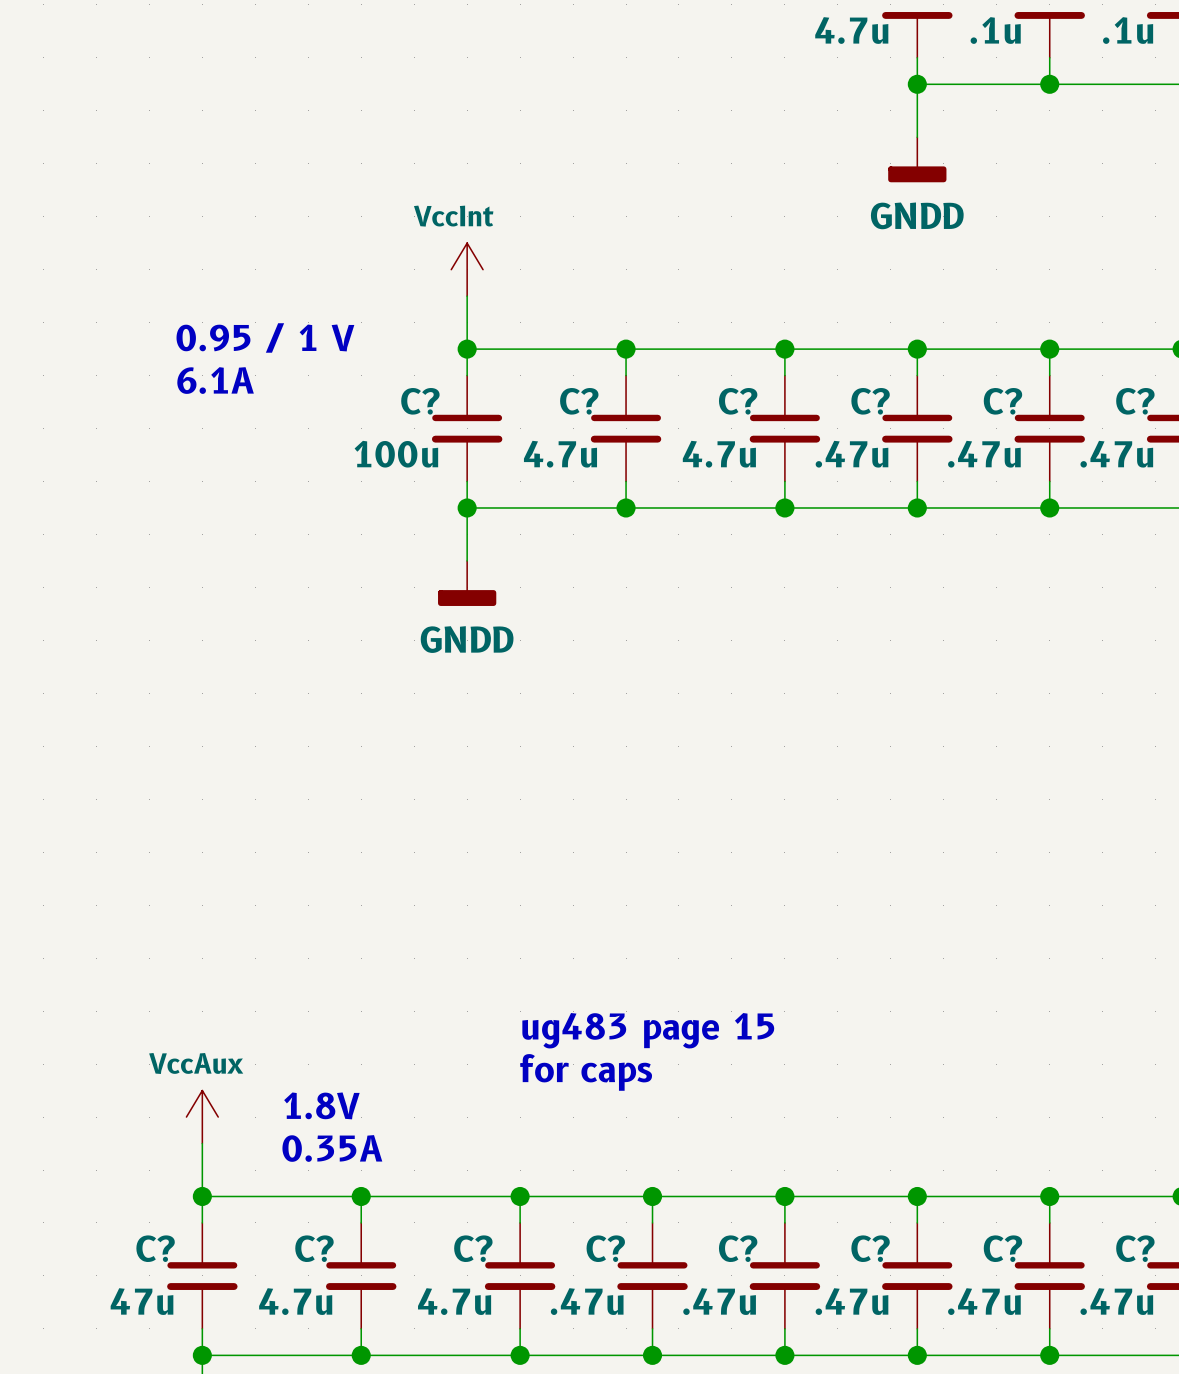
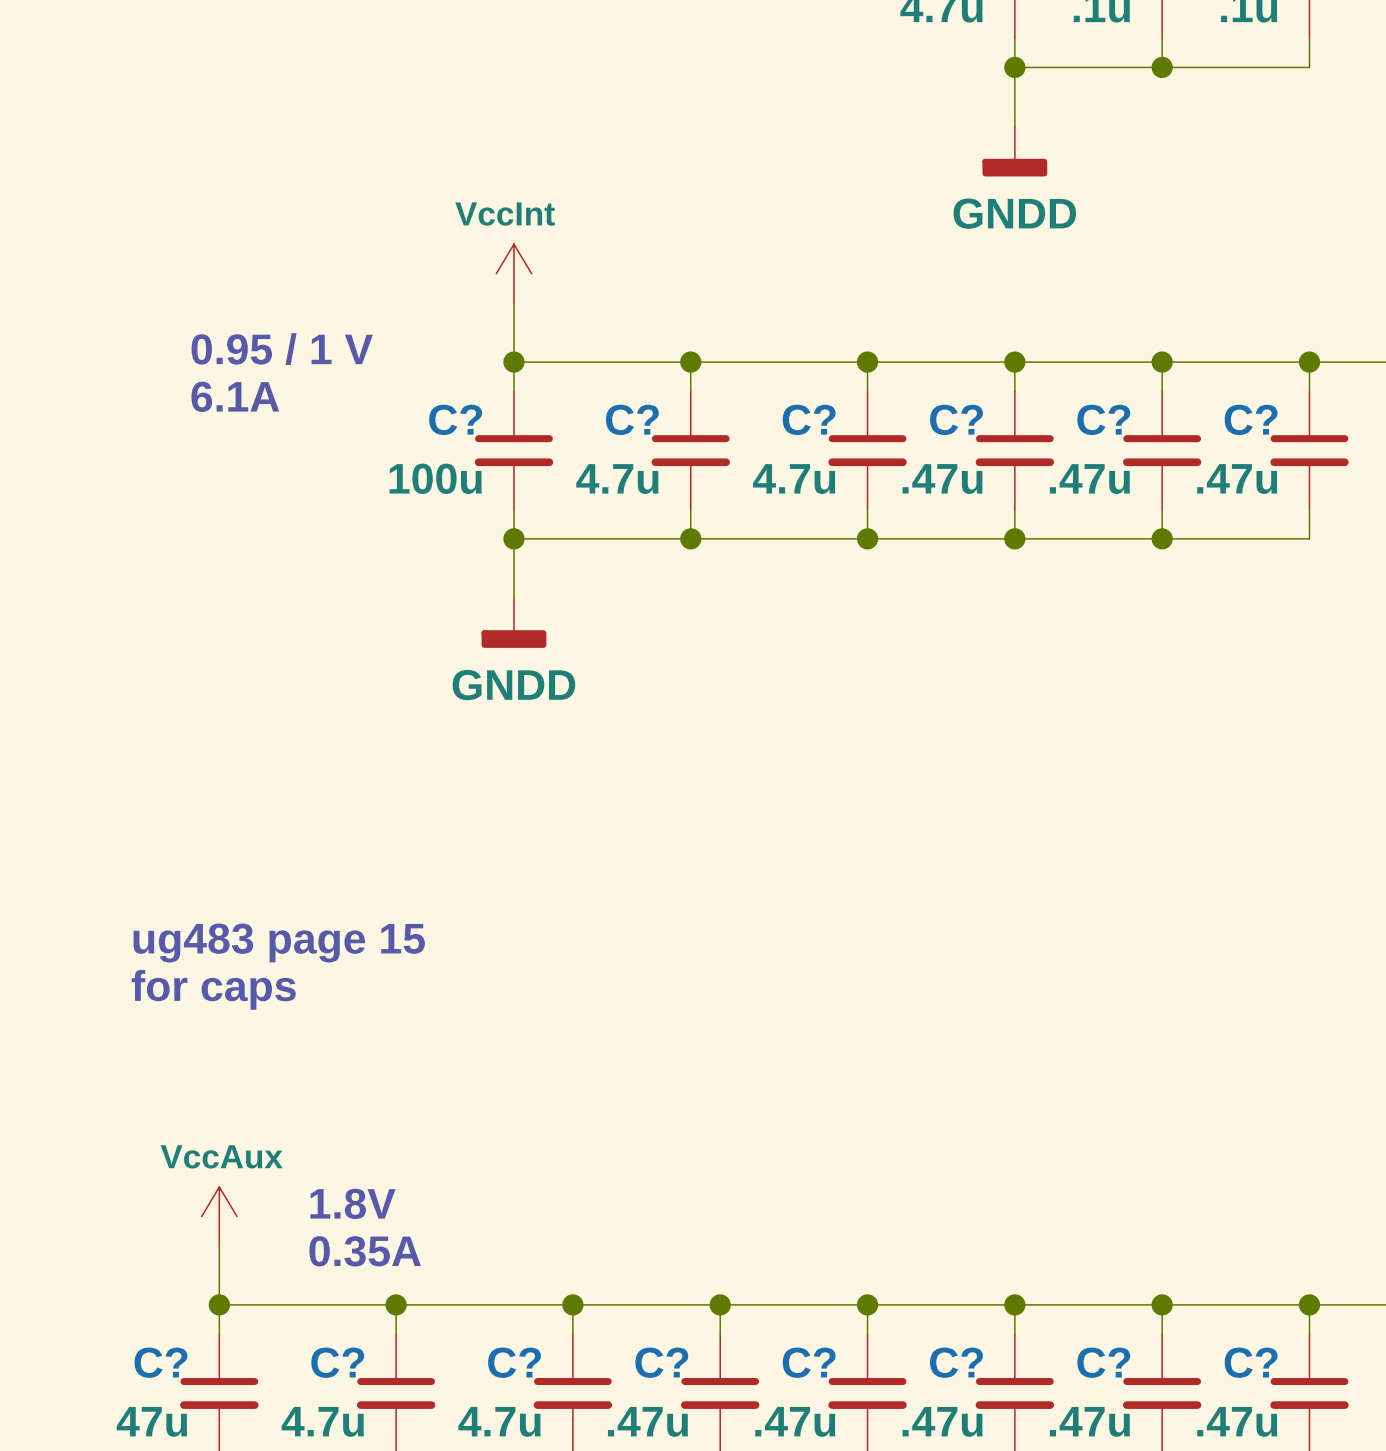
text position: ug483 page 15 (648, 1030) -> ug483 page 15 (279, 943)
text position: for caps (586, 1072) -> for caps (213, 989)

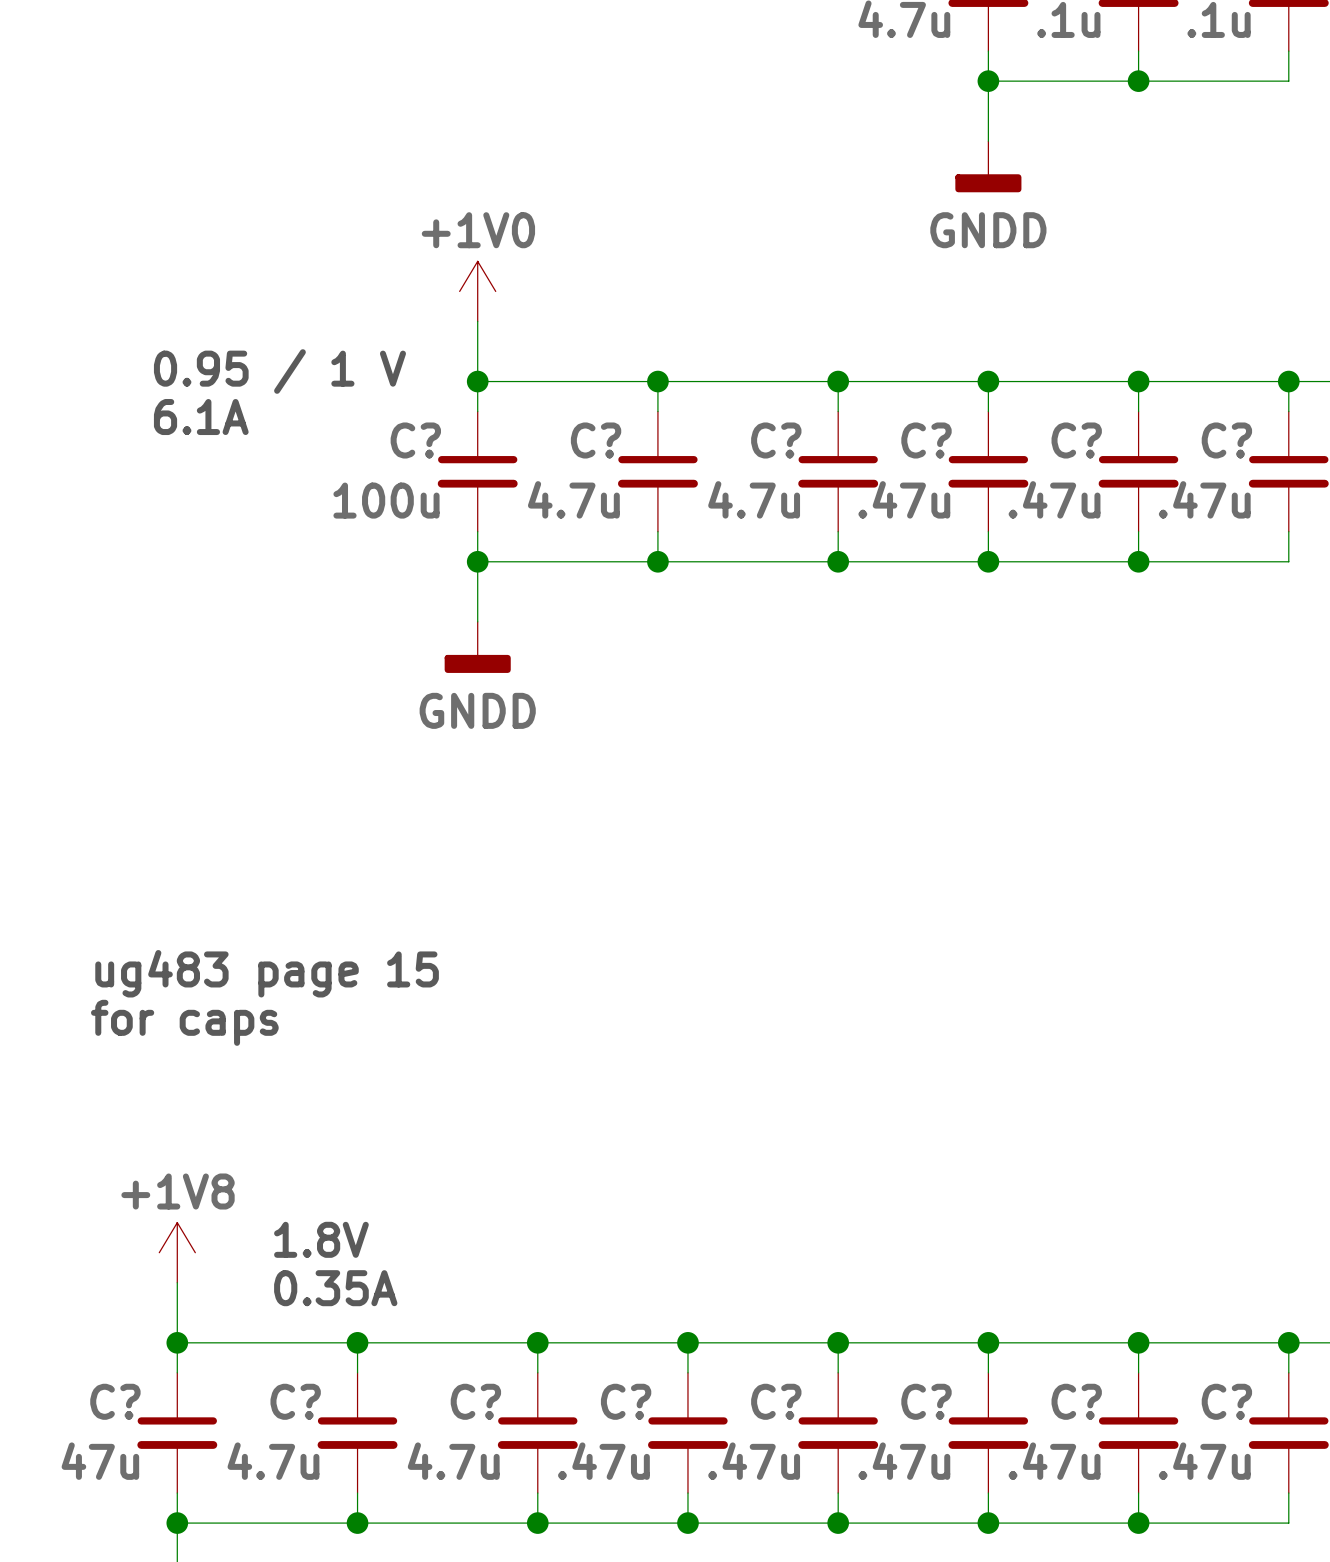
part: VccInt (513, 273) -> none
power symbol: none -> +1V0 (477, 291)
part: VccAux (219, 1216) -> none
power symbol: none -> +1V8 (177, 1252)

